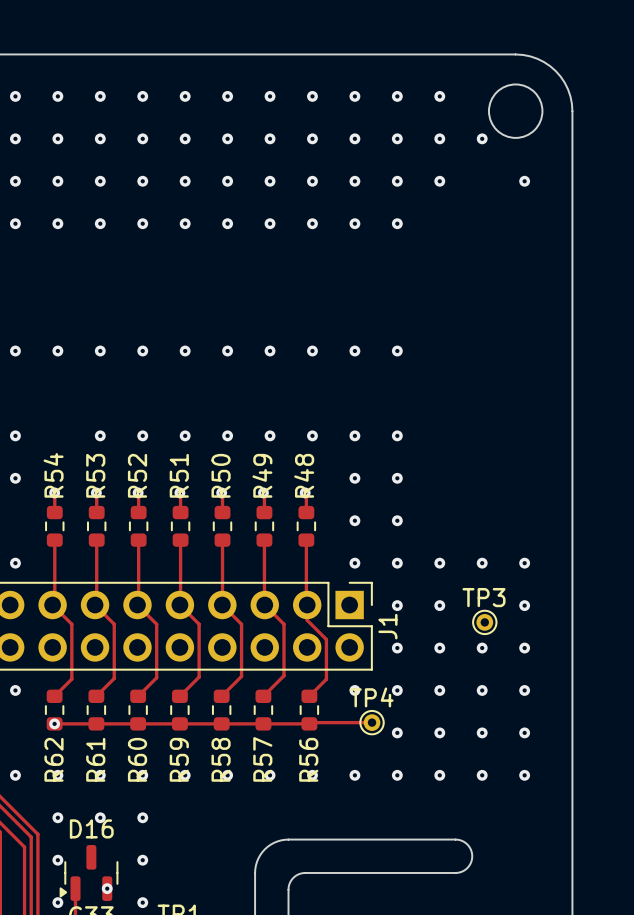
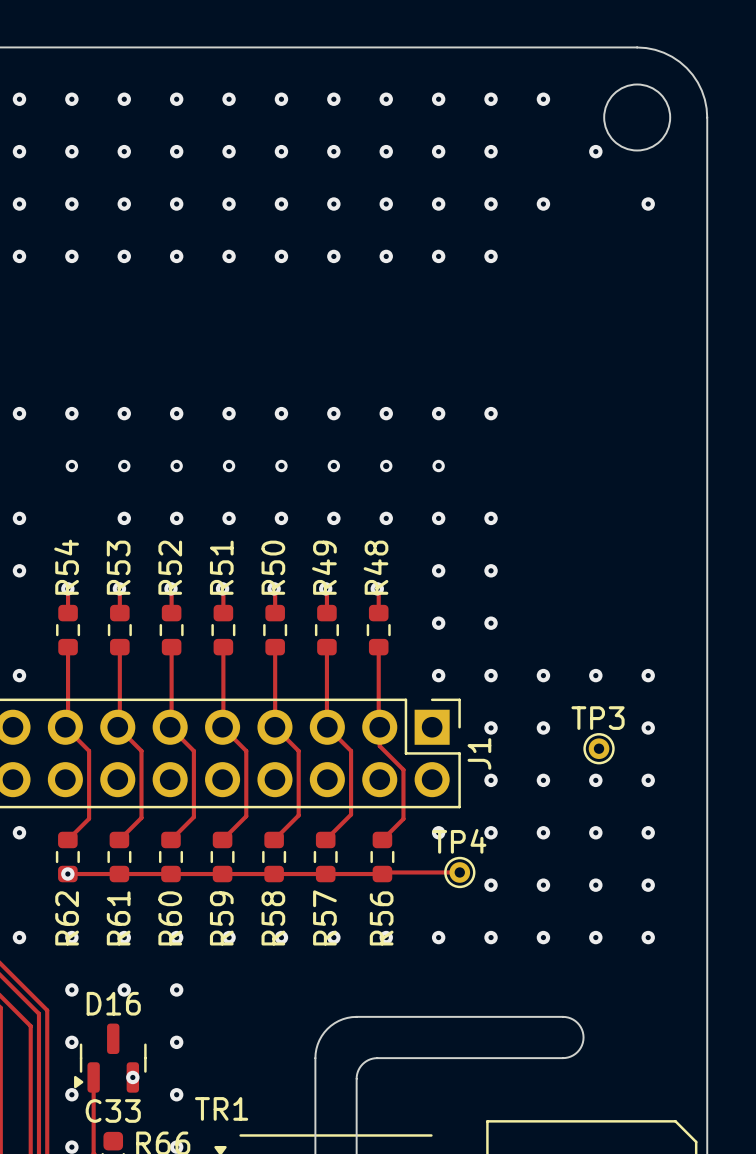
via: (439, 138) -> none
via: none -> (71, 466)
via: none -> (124, 466)
via: none -> (176, 466)
via: none -> (229, 466)
via: none -> (281, 466)
via: none -> (333, 466)
via: none -> (386, 466)
via: none -> (438, 466)

